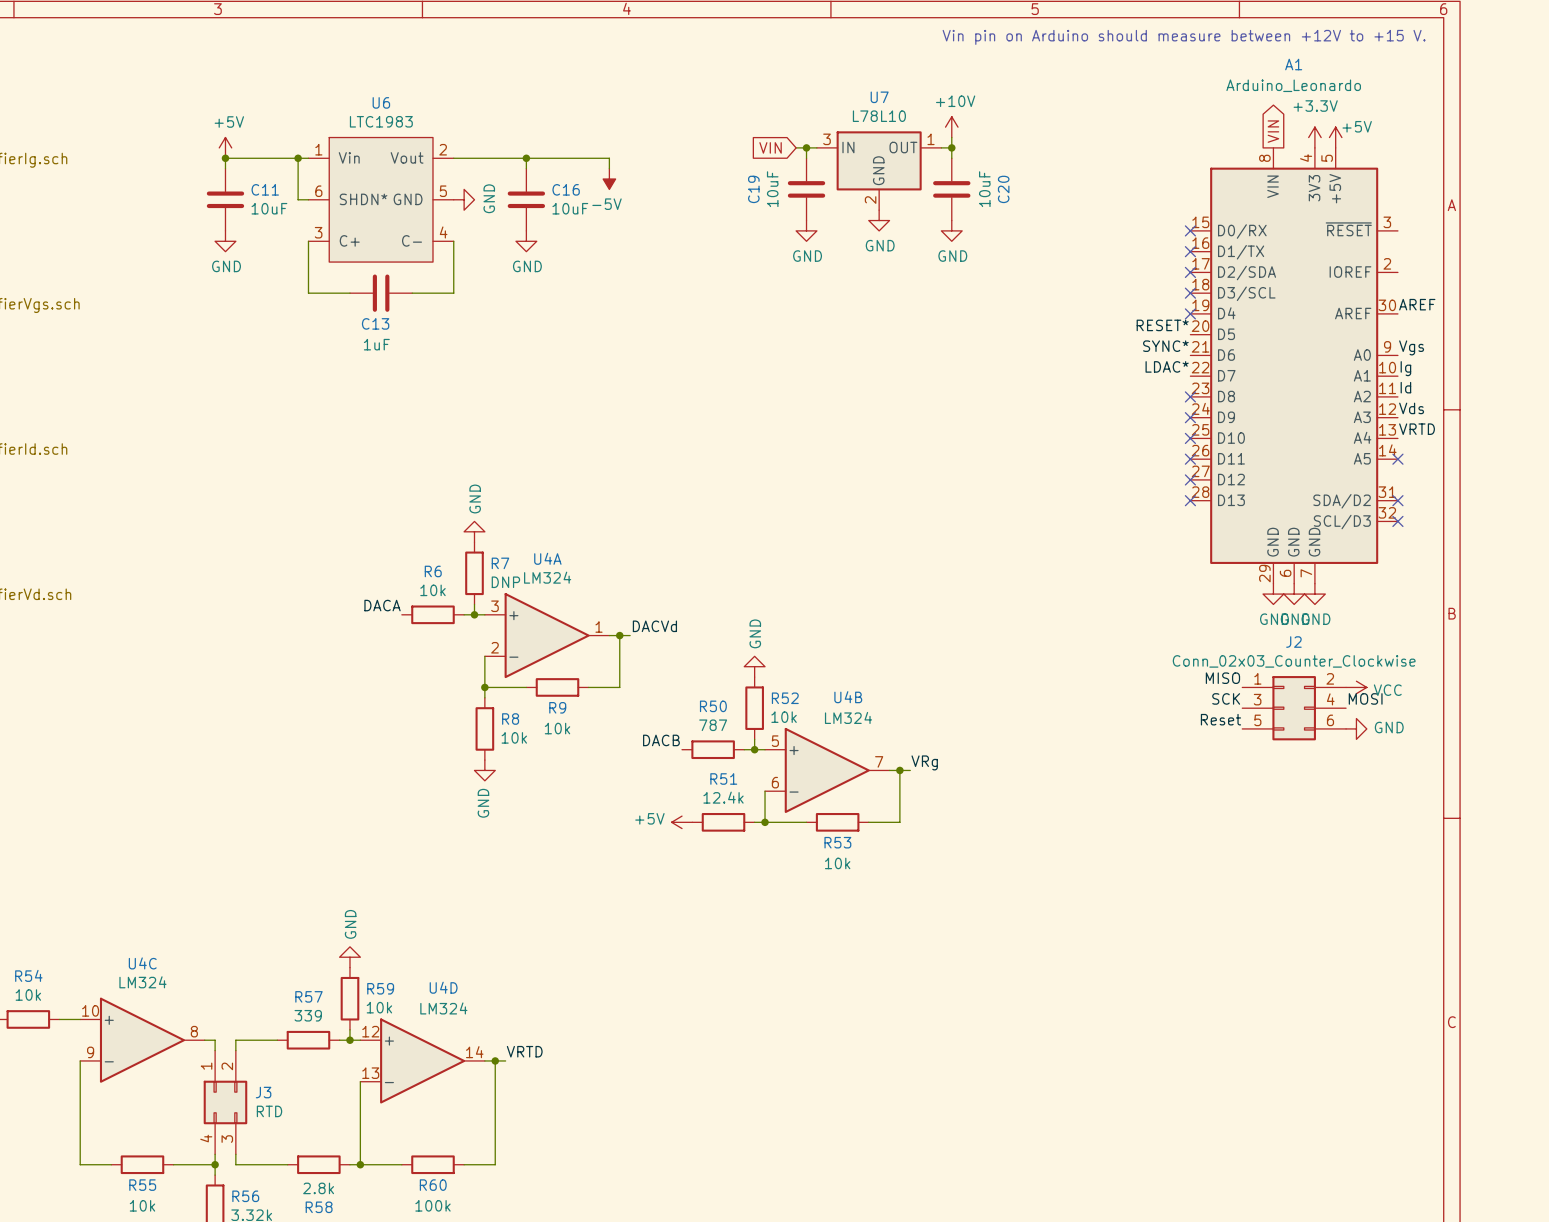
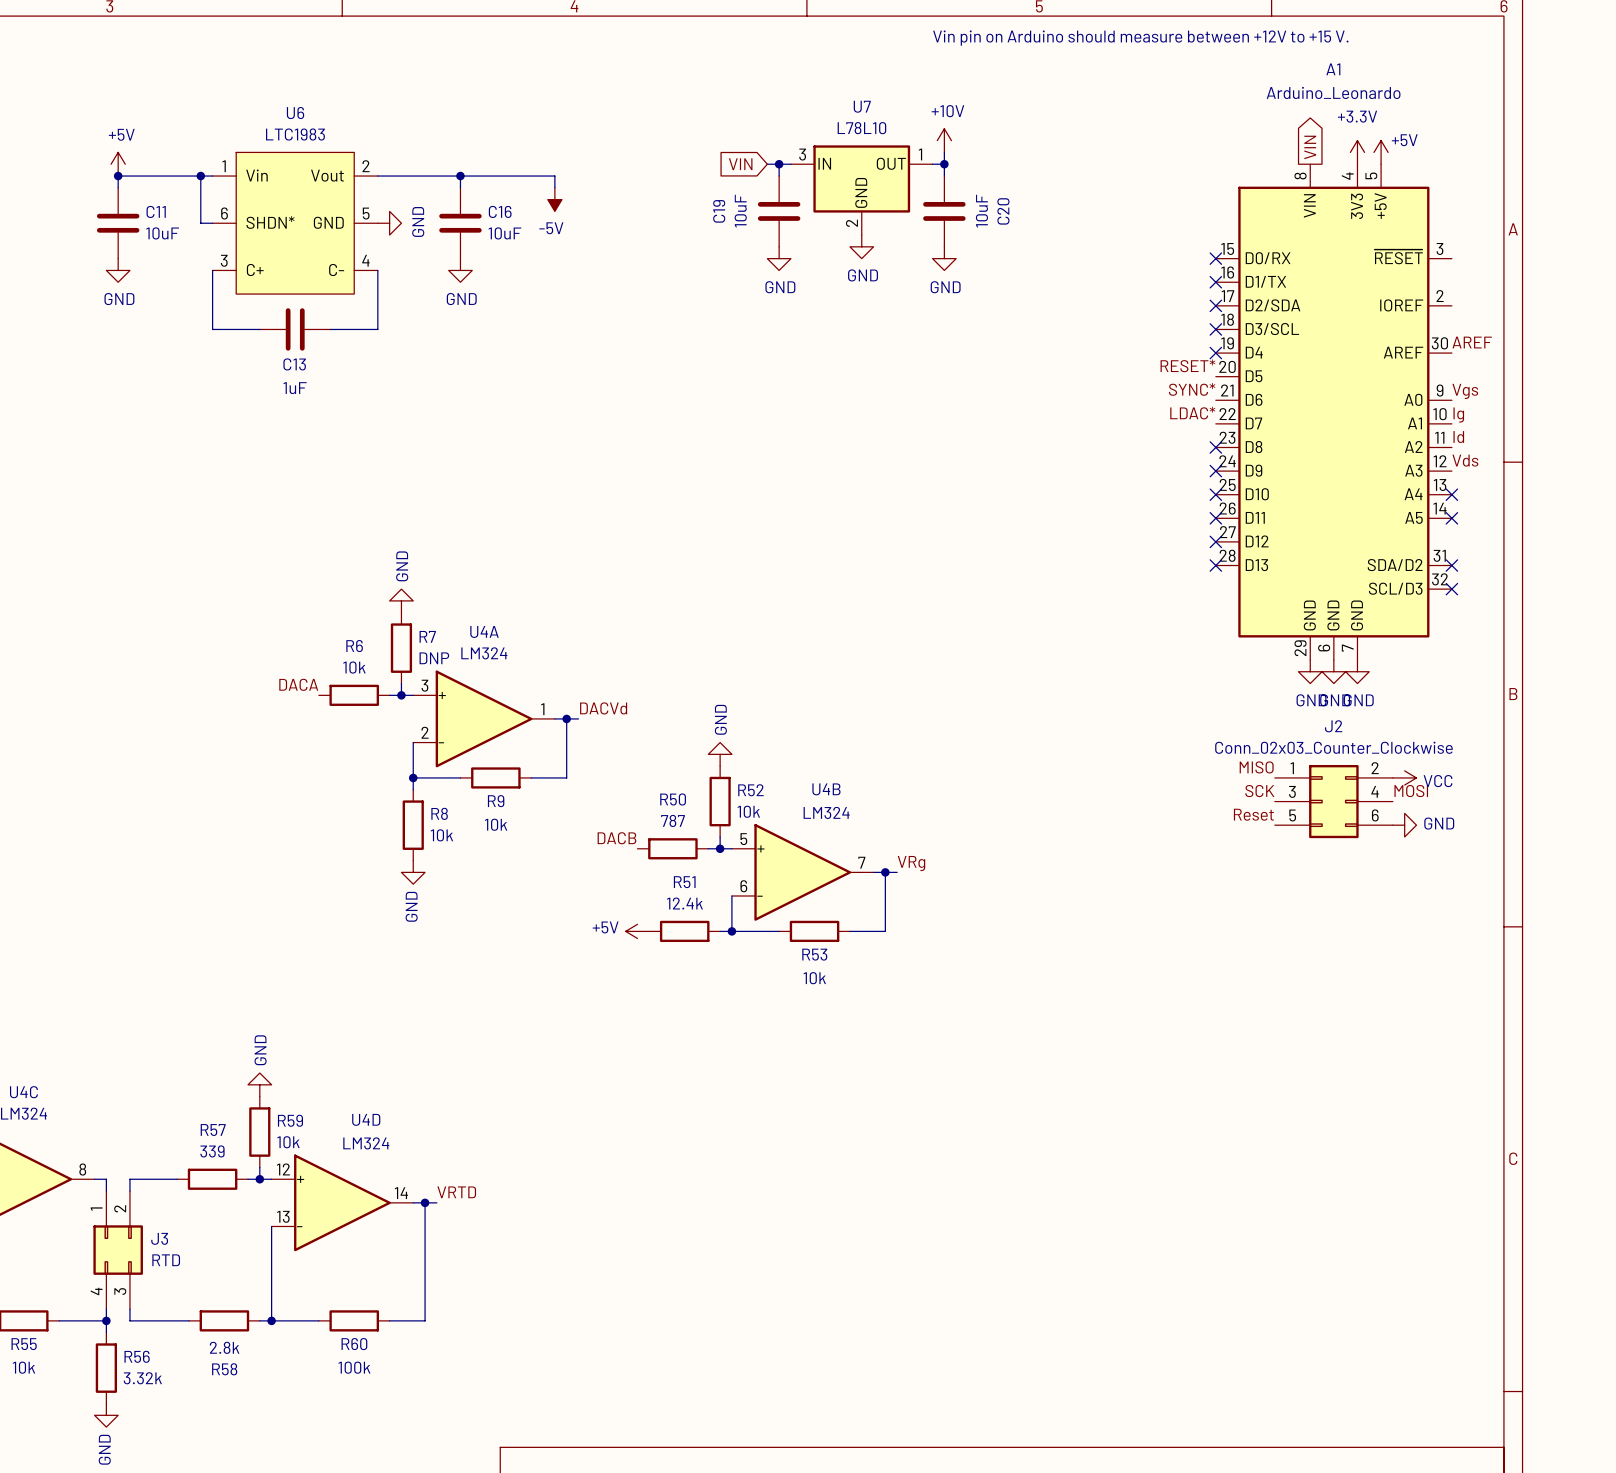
label: VRTD (1417, 429) -> none
no-connect mark: none -> (1451, 494)

